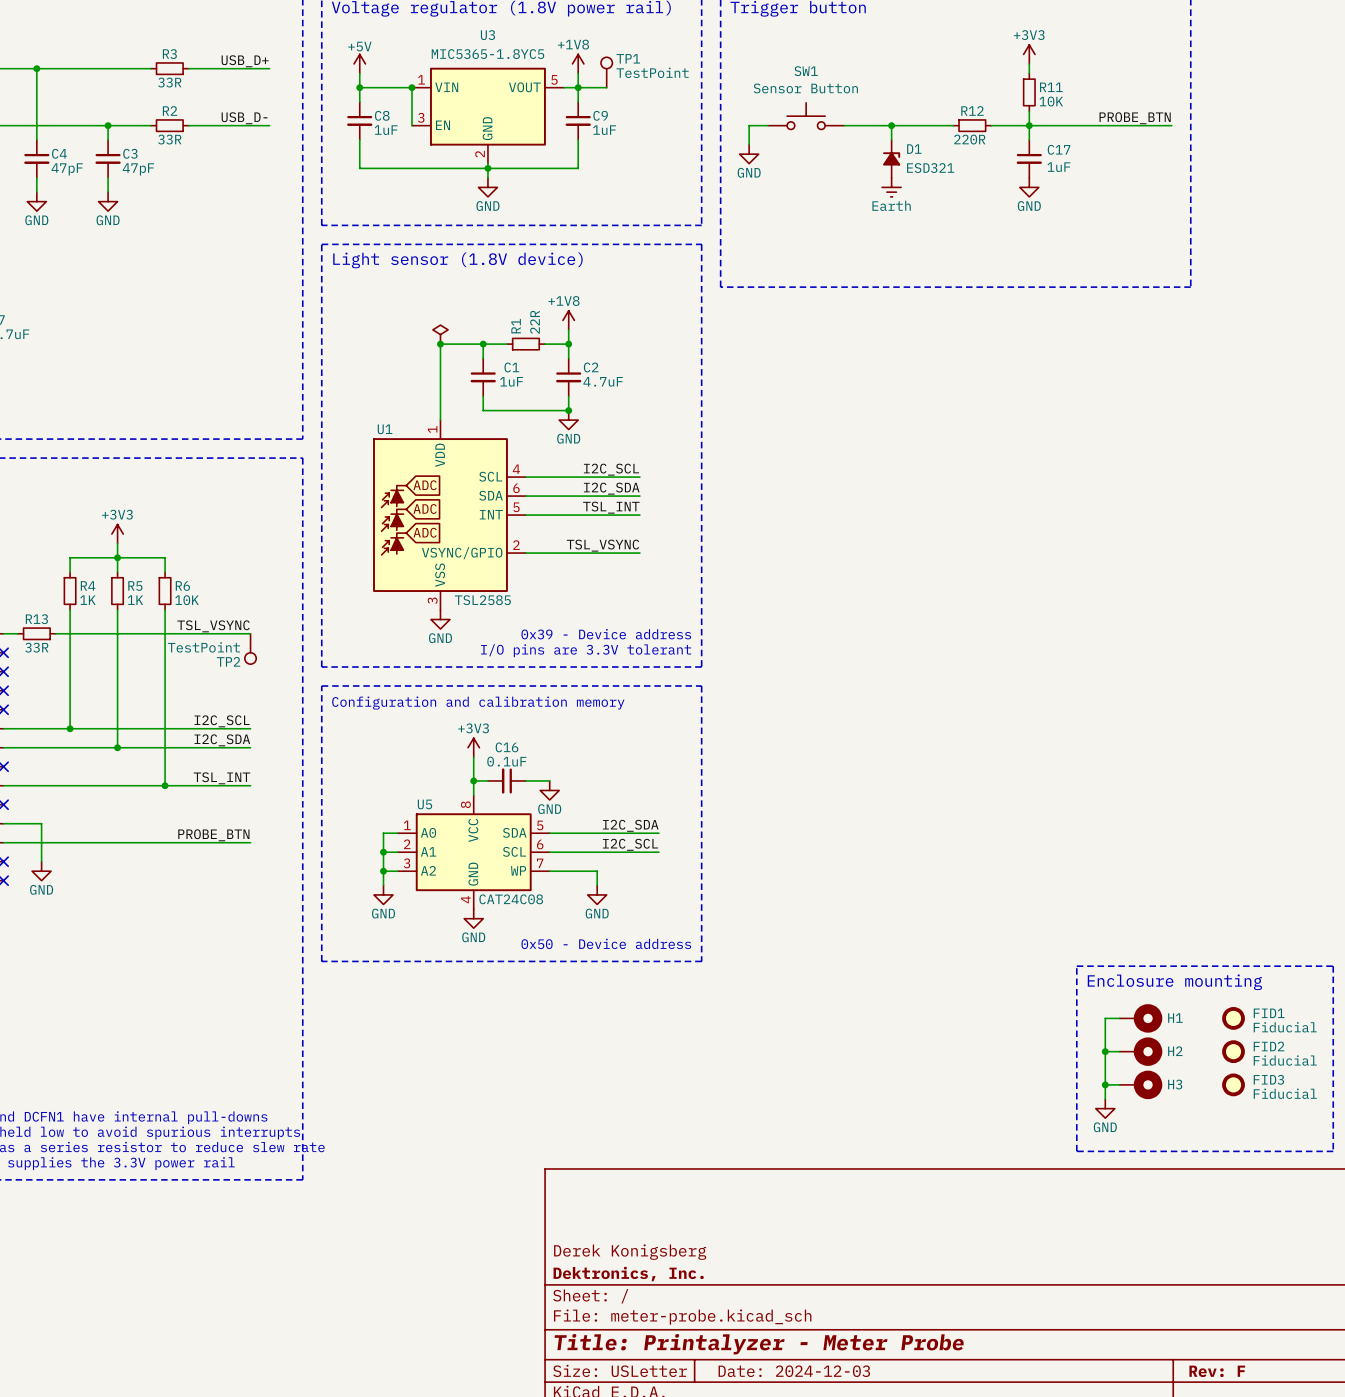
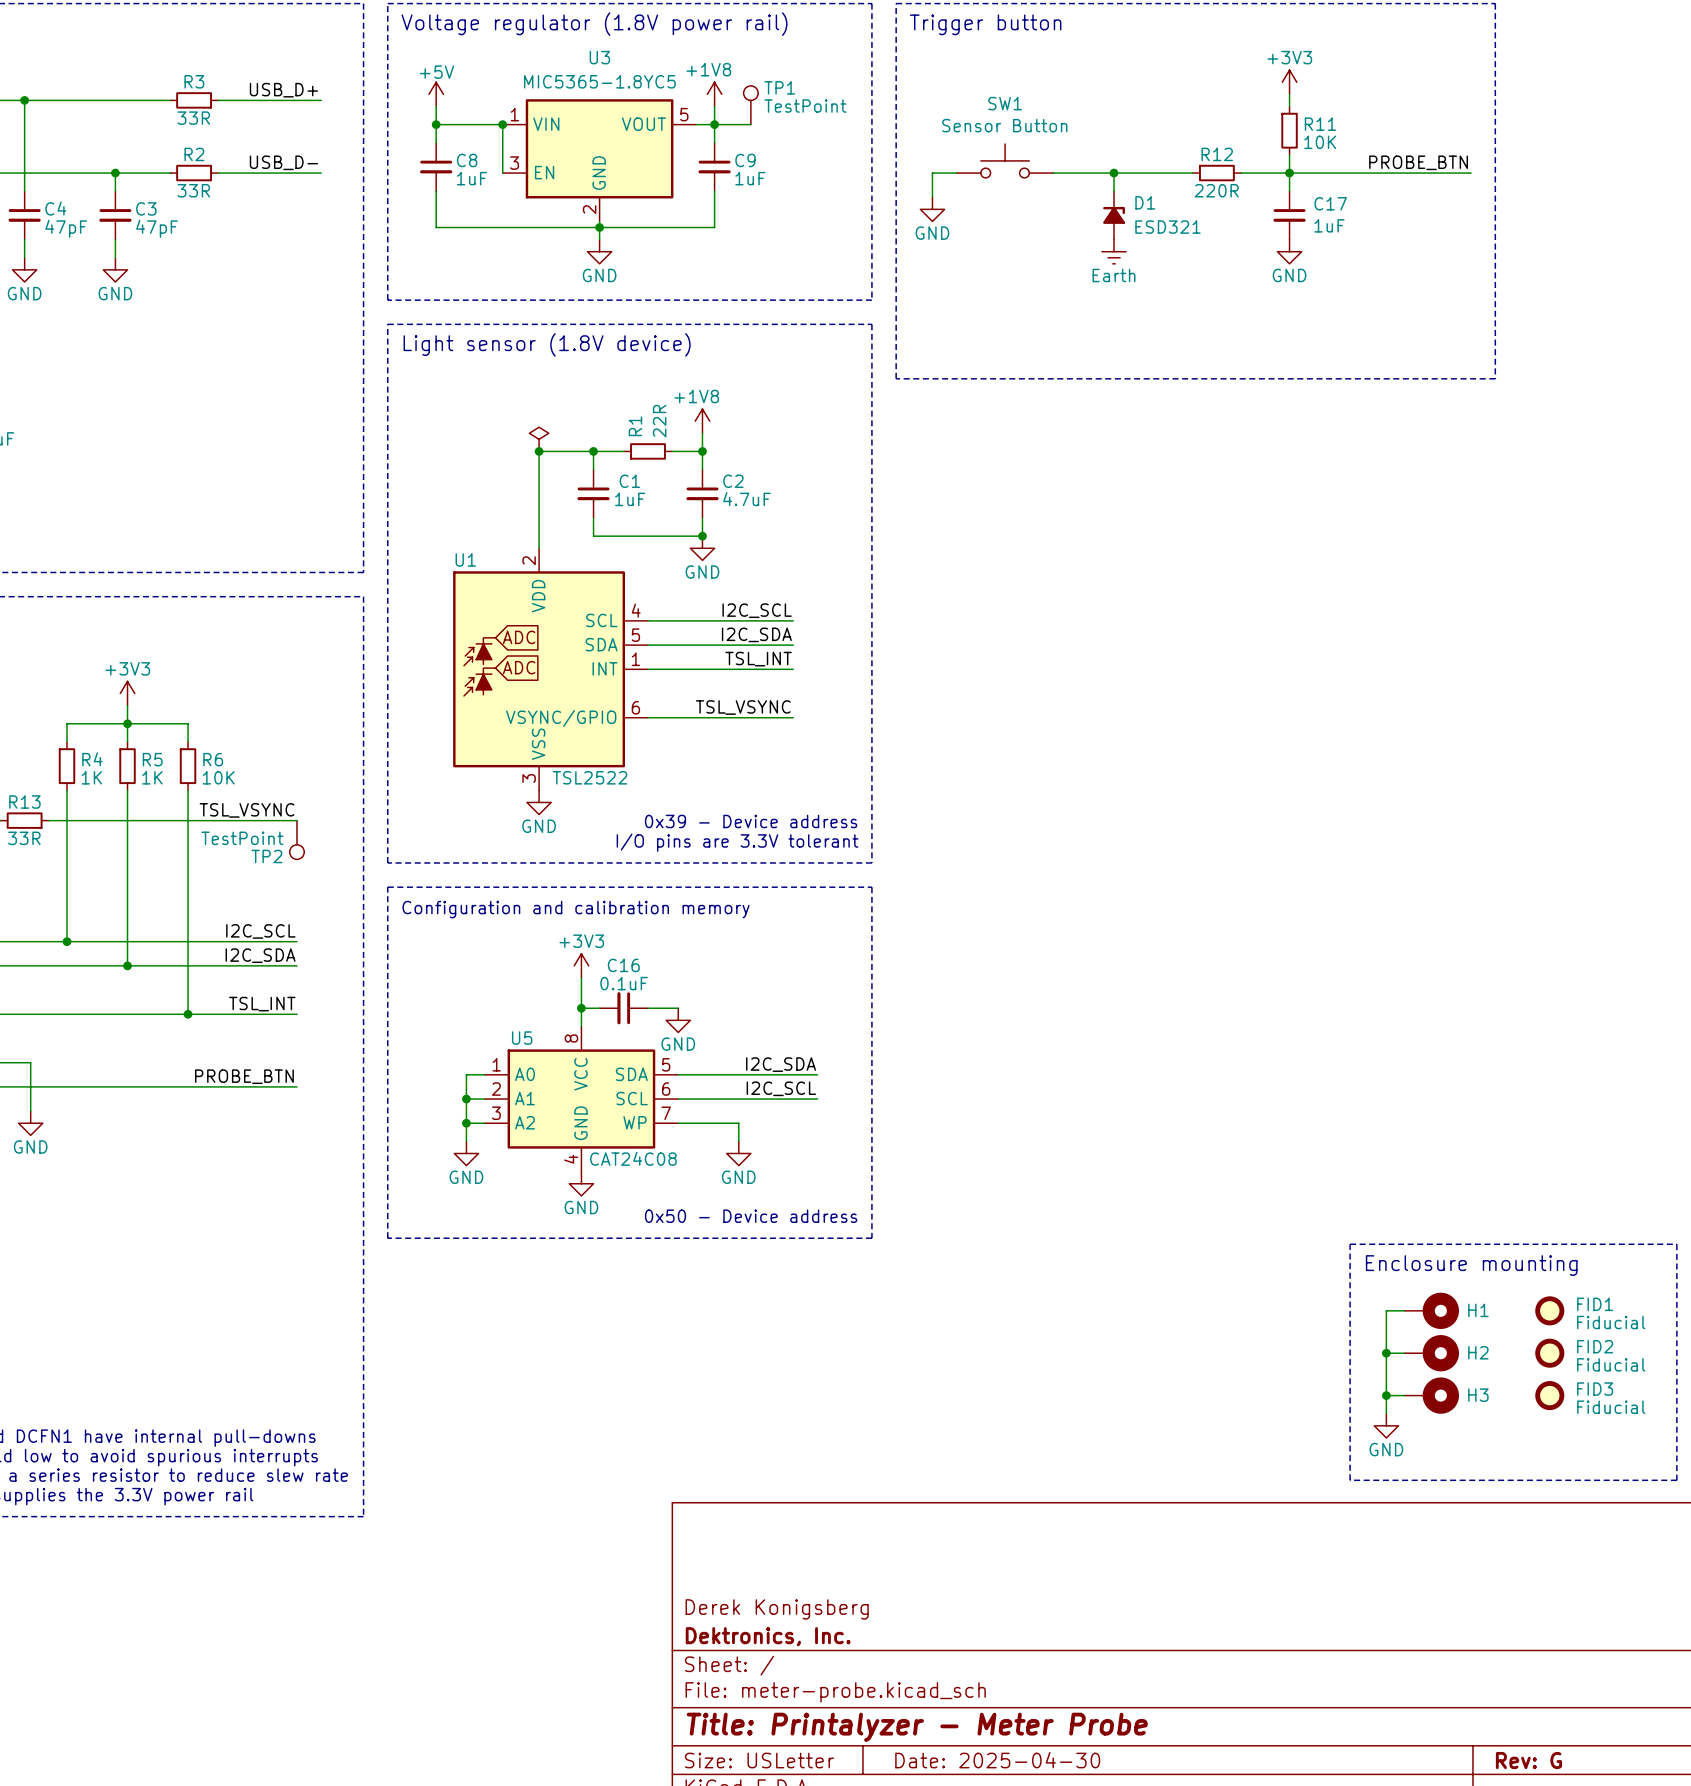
U1 symbol: [373, 420, 526, 611] -> [453, 548, 649, 791]
U1 value: TSL2585 (482, 600) -> TSL2522 (589, 777)
title block: Date: 2024-12-03 (794, 1371) -> Date: 2025-04-30 (997, 1760)
title block: Rev: F (1217, 1371) -> Rev: G (1528, 1760)

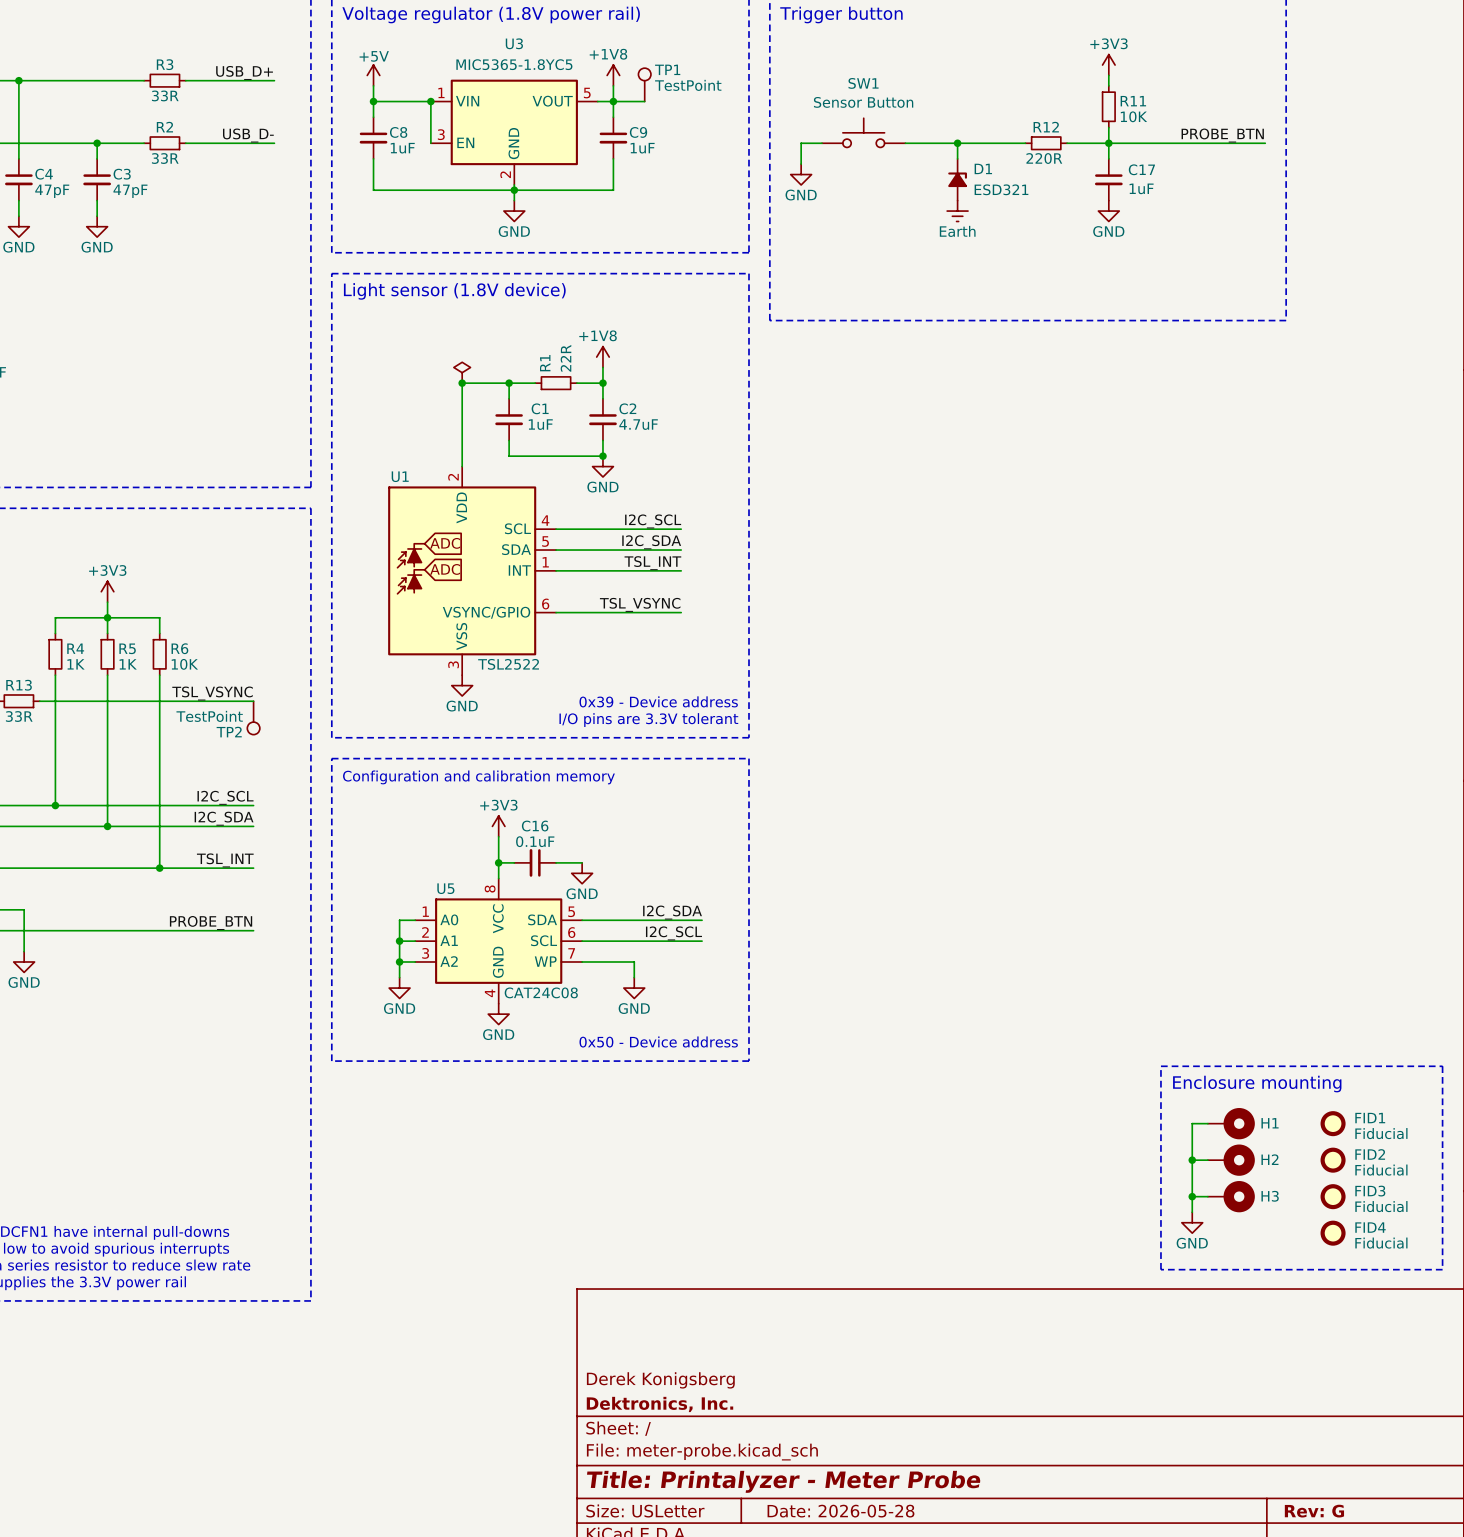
FID4: none -> Fiducial (1333, 1233)
title block: Date: 2025-04-30 (997, 1760) -> Date: 2026-05-28 (840, 1511)

